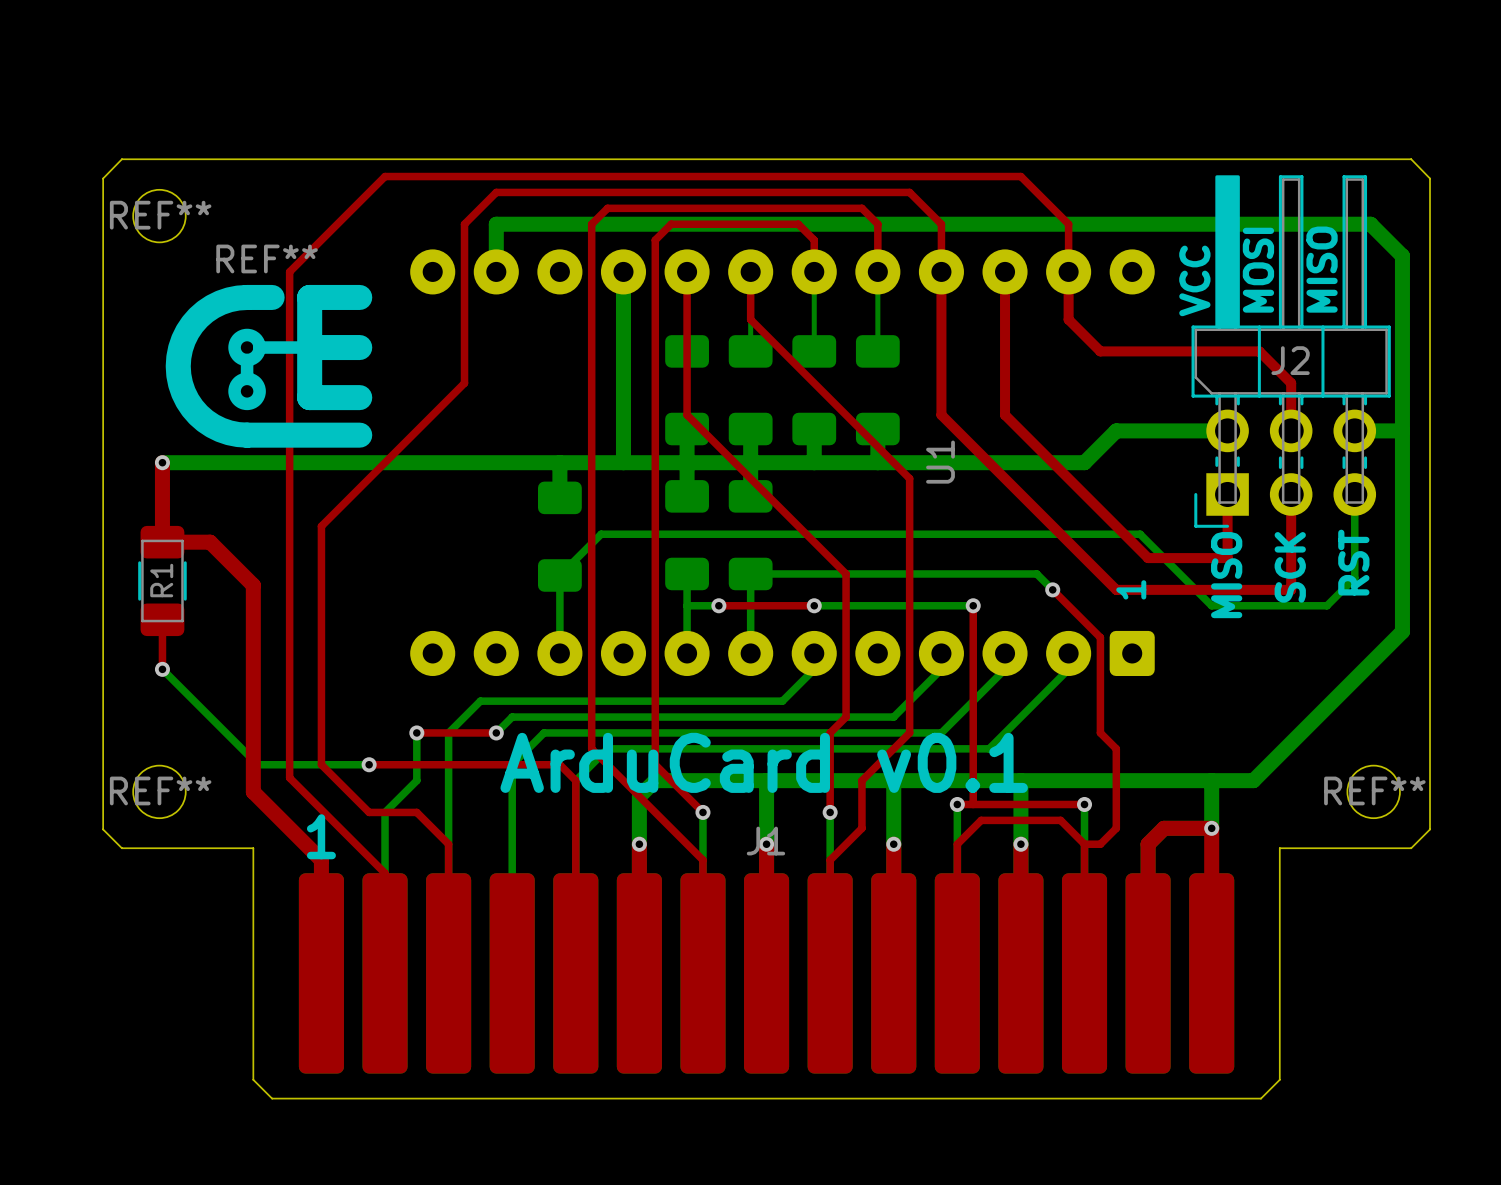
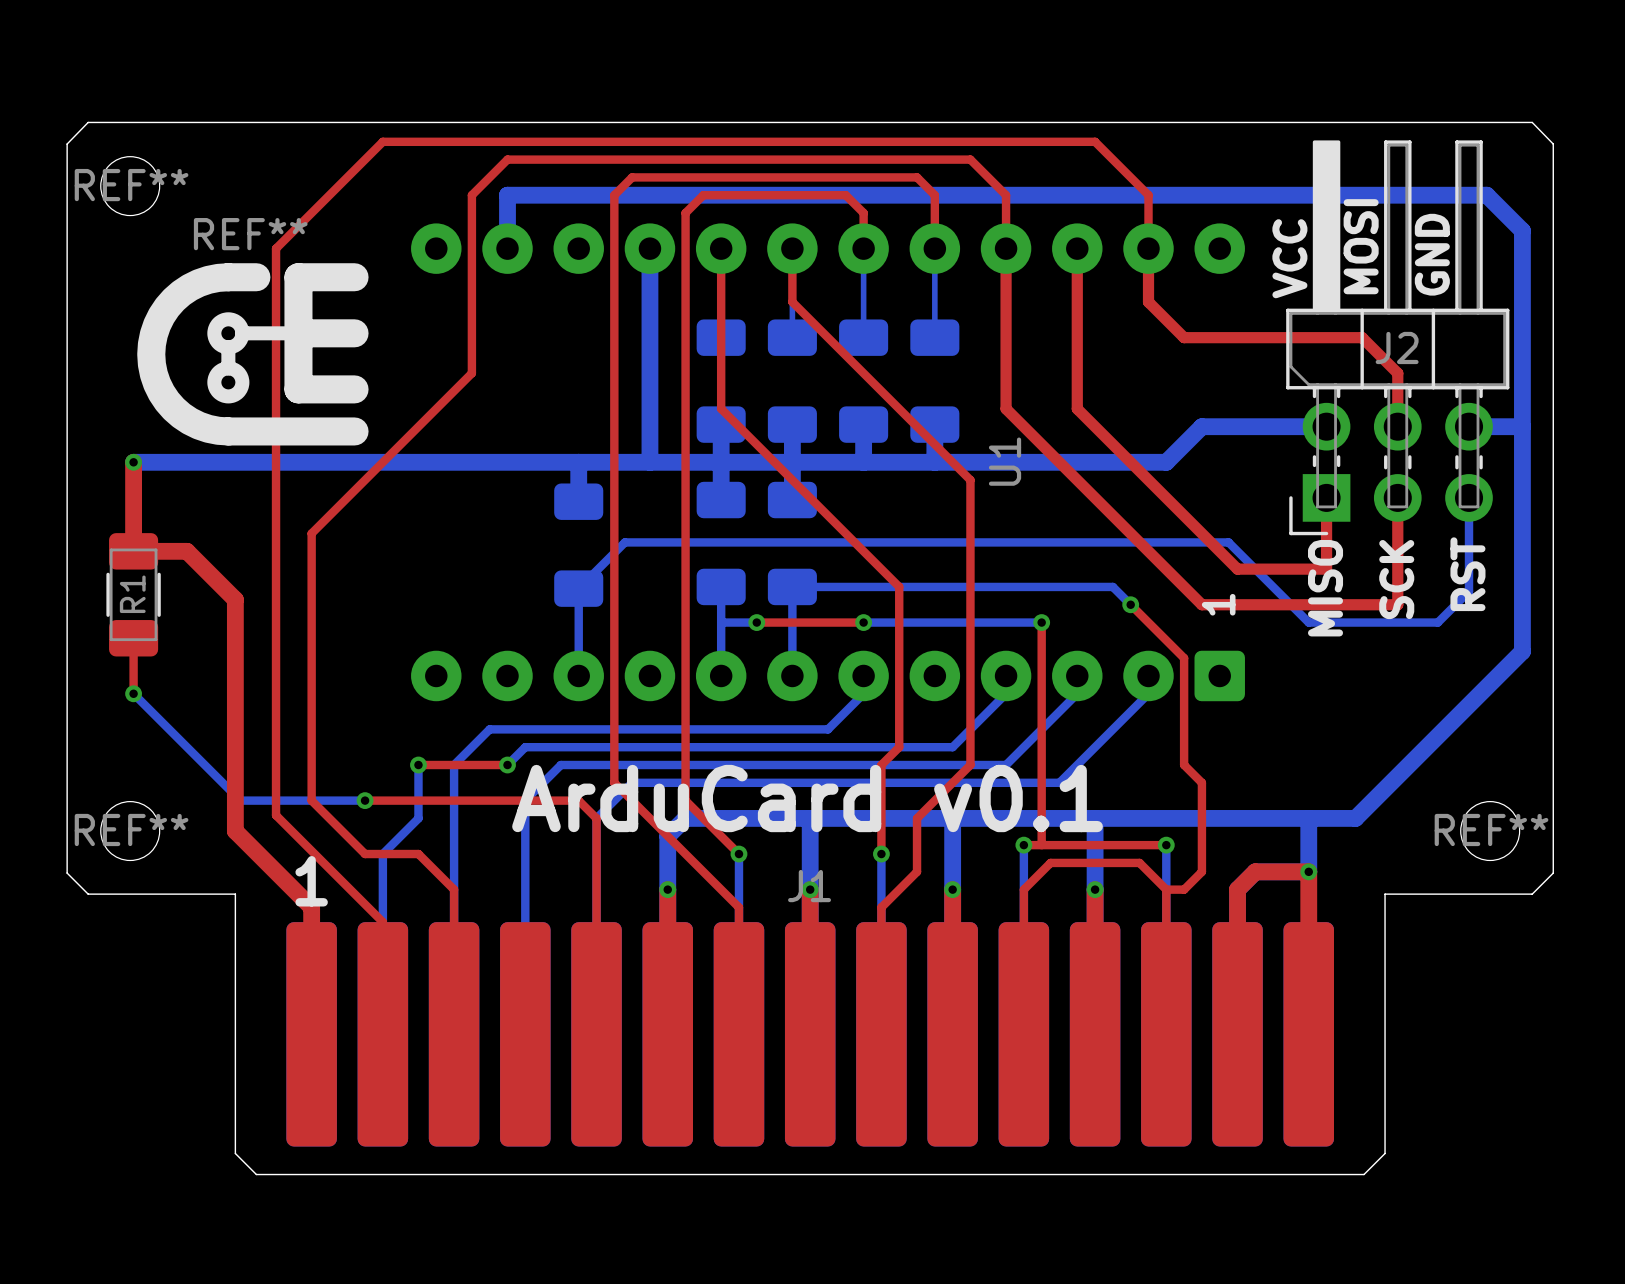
text: MISO (1322, 269) -> GND (1432, 254)

